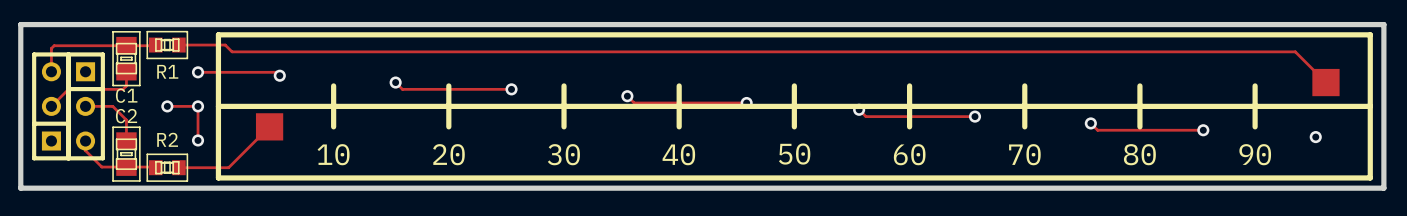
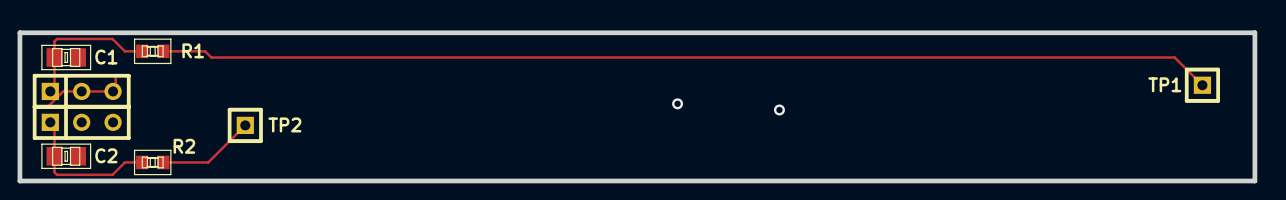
line: (218, 34) (1370, 34) (1370, 177) (218, 177) (218, 34) -> none
track: (155, 45) (54, 45) (51, 48) (51, 71) -> (142, 51) (124, 51) (112, 38) (56, 38) (54, 41) (54, 87) (50, 91)
C1 rotation: 0° (126, 58) -> 90° clockwise (66, 57)
C1 position: (126, 58) -> (66, 57)
R1 name position: R1 (167, 71) -> R1 (193, 50)
track: (198, 72) (276, 72) (279, 75) -> none
via: (198, 72) -> none
via: (279, 75) -> none
track: (395, 82) (402, 89) (511, 89) -> none
via: (395, 82) -> none
part: (1325, 82) -> none
TP1: none -> (1202, 85)
line: (333, 85) (333, 126) -> none
line: (448, 85) (448, 126) -> none
line: (564, 85) (564, 126) -> none
line: (679, 85) (679, 126) -> none
line: (794, 85) (794, 126) -> none
line: (909, 85) (909, 126) -> none
line: (1024, 85) (1024, 126) -> none
line: (1139, 85) (1139, 126) -> none
line: (1255, 85) (1255, 126) -> none
part: none -> (81, 91)
via: (511, 89) -> none
C1 name position: C1 (126, 95) -> C1 (106, 57)
track: (627, 96) (634, 103) (746, 103) -> none
via: (627, 96) -> none
part: (51, 106) -> none
track: (85, 106) (112, 106) (126, 120) (126, 141) -> none
part: (85, 106) -> none
track: (167, 106) (198, 106) (198, 140) -> none
via: (167, 106) -> none
via: (198, 106) -> none
line: (218, 106) (1370, 106) -> none
track: (859, 109) (865, 116) (974, 116) -> none
via: (974, 116) -> none
part: none -> (81, 122)
track: (1090, 123) (1097, 130) (1203, 130) -> none
via: (1090, 123) -> none
part: (269, 126) -> none
TP2: none -> (245, 125)
via: (1203, 130) -> none
via: (1315, 137) -> none
R2 name position: R2 (167, 139) -> R2 (184, 146)
via: (198, 140) -> none
track: (85, 141) (85, 150) (101, 167) (155, 167) -> (50, 122) (54, 126) (54, 172) (56, 174) (112, 174) (124, 162) (142, 162)
C2 rotation: 0° (126, 154) -> 90° clockwise (66, 156)
C2 position: (126, 154) -> (66, 156)
text: 10 (333, 154) -> none
text: 20 (448, 154) -> none
text: 30 (563, 154) -> none
text: 40 (678, 154) -> none
text: 50 (794, 154) -> none
text: 60 (909, 154) -> none
text: 70 (1024, 154) -> none
text: 80 (1139, 154) -> none
text: 90 (1255, 154) -> none

